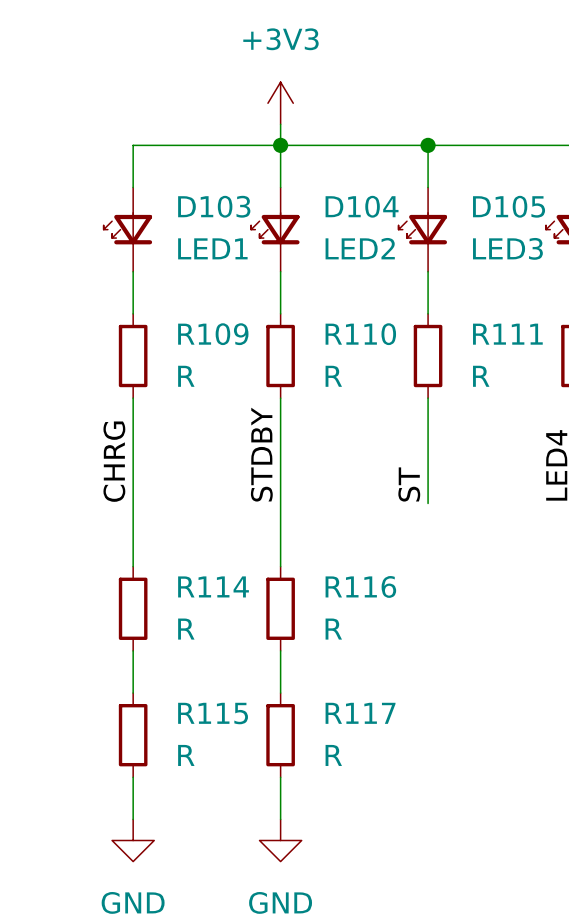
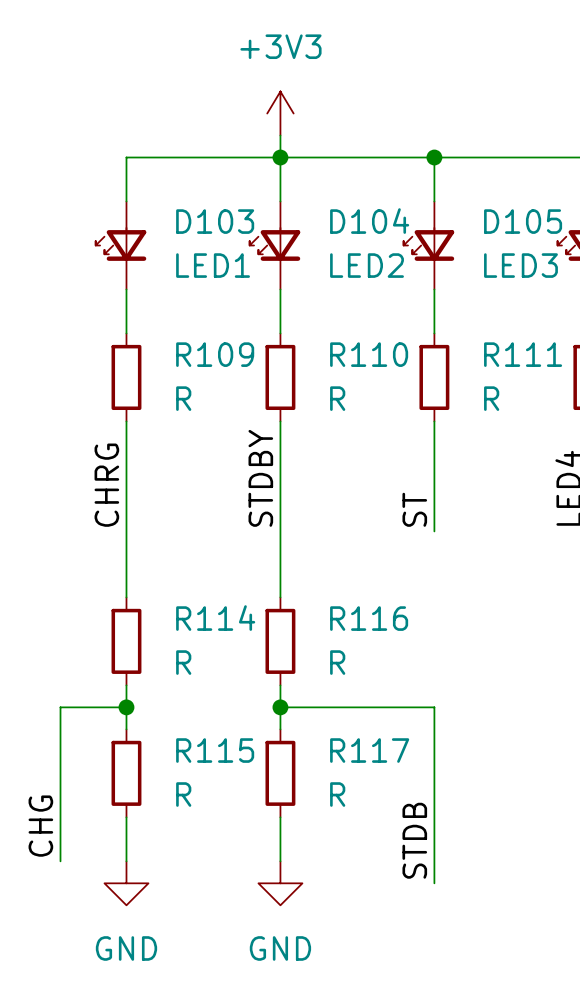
wire: none -> (126, 707) (60, 707) (60, 861)
junction: none -> (126, 707)
wire: none -> (280, 707) (434, 707) (434, 883)
junction: none -> (280, 707)
label: none -> CHG (40, 826)
label: none -> STDB (414, 840)

